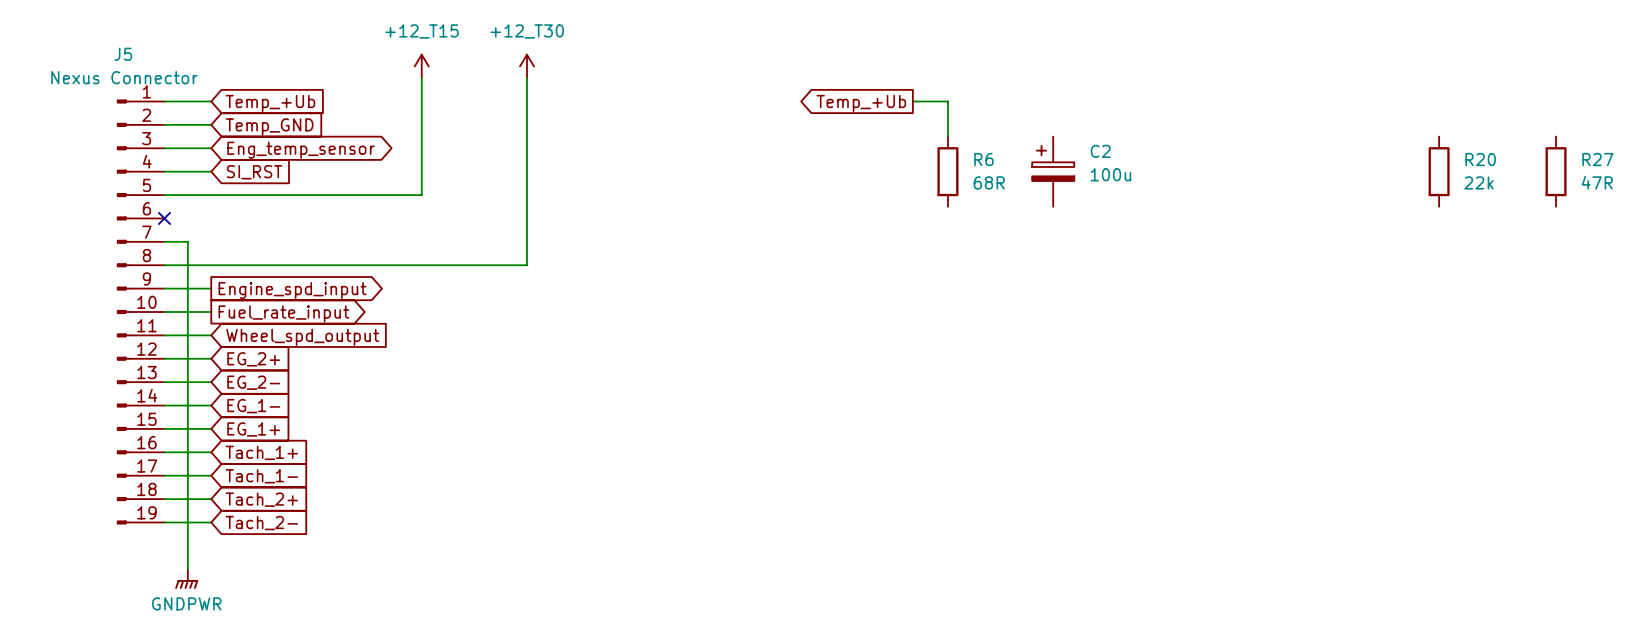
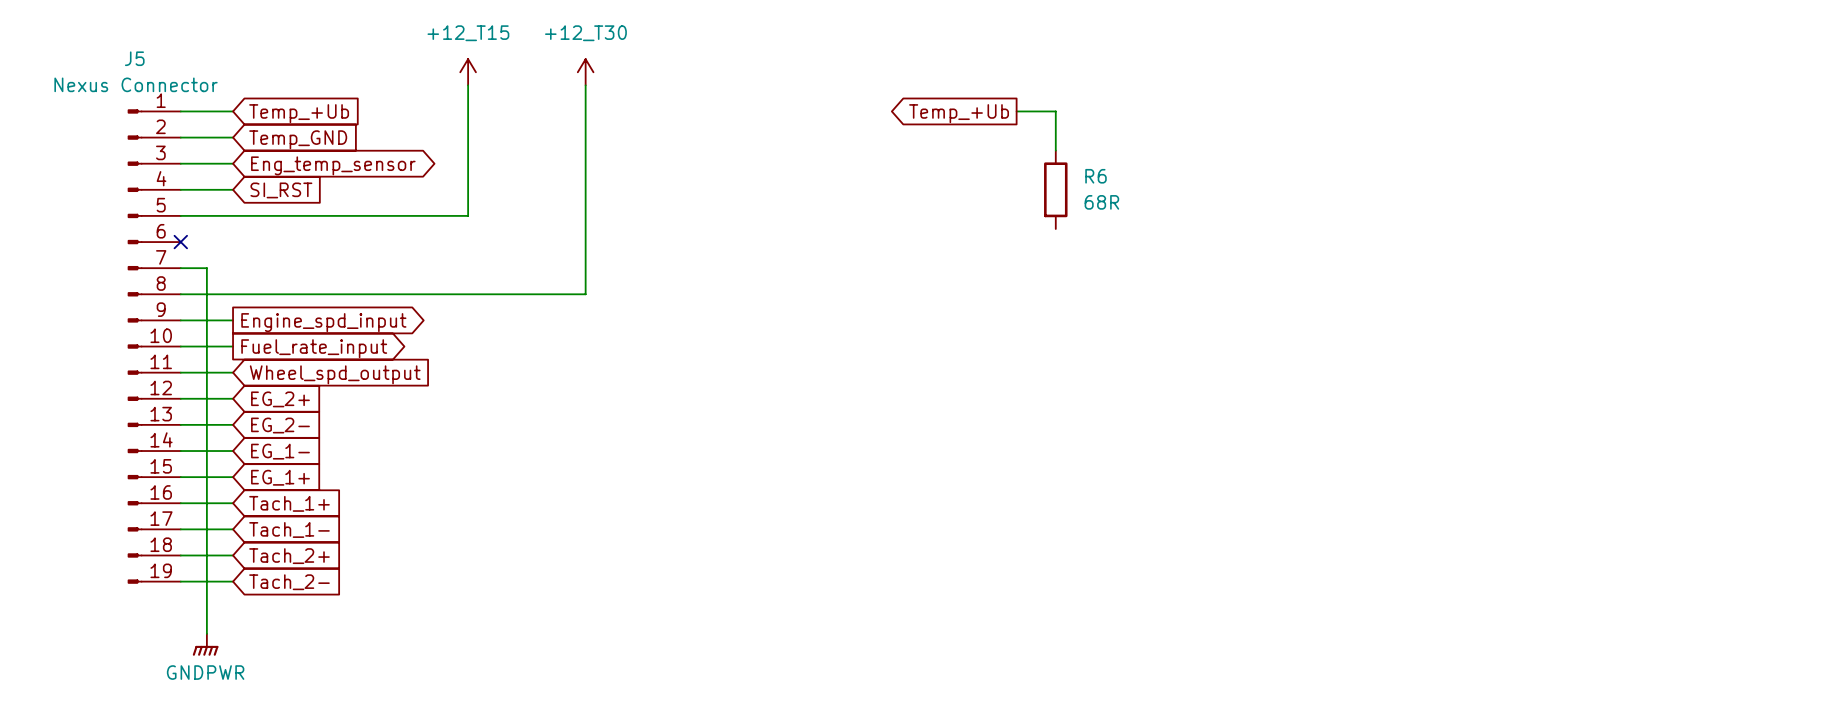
C2: 100u (1053, 171) -> none
R20: 22k (1439, 171) -> none
R27: 47R (1556, 171) -> none

